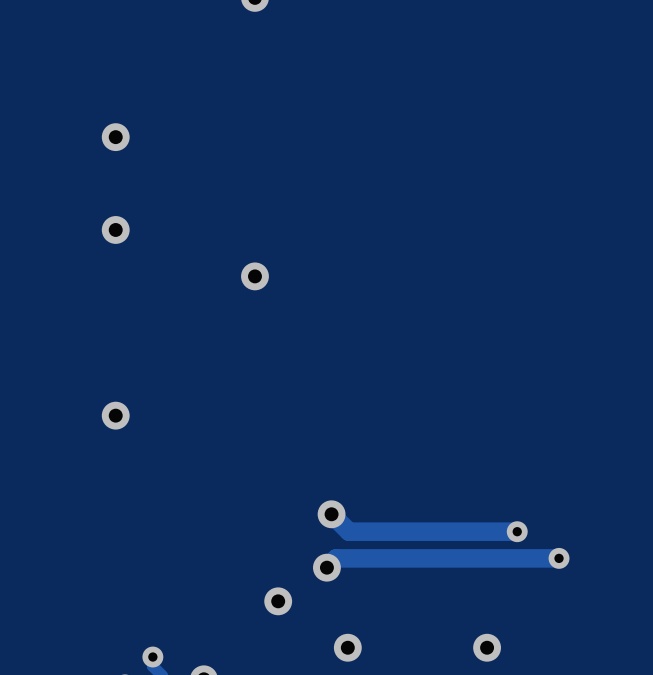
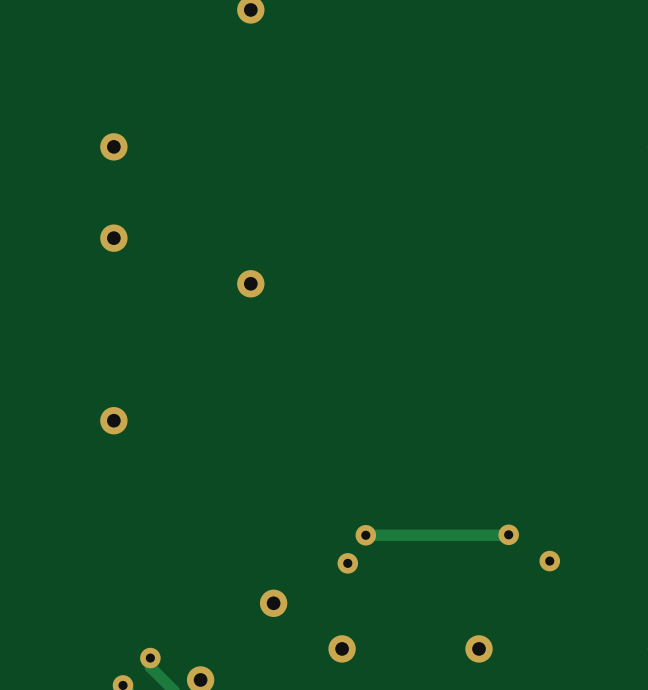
track: (331, 514) (348, 531) (517, 531) -> (365, 535) (508, 535)
via: (331, 514) -> none
via: none -> (365, 535)
track: (559, 558) (336, 558) (326, 567) -> none
via: none -> (347, 563)
via: (326, 567) -> none

